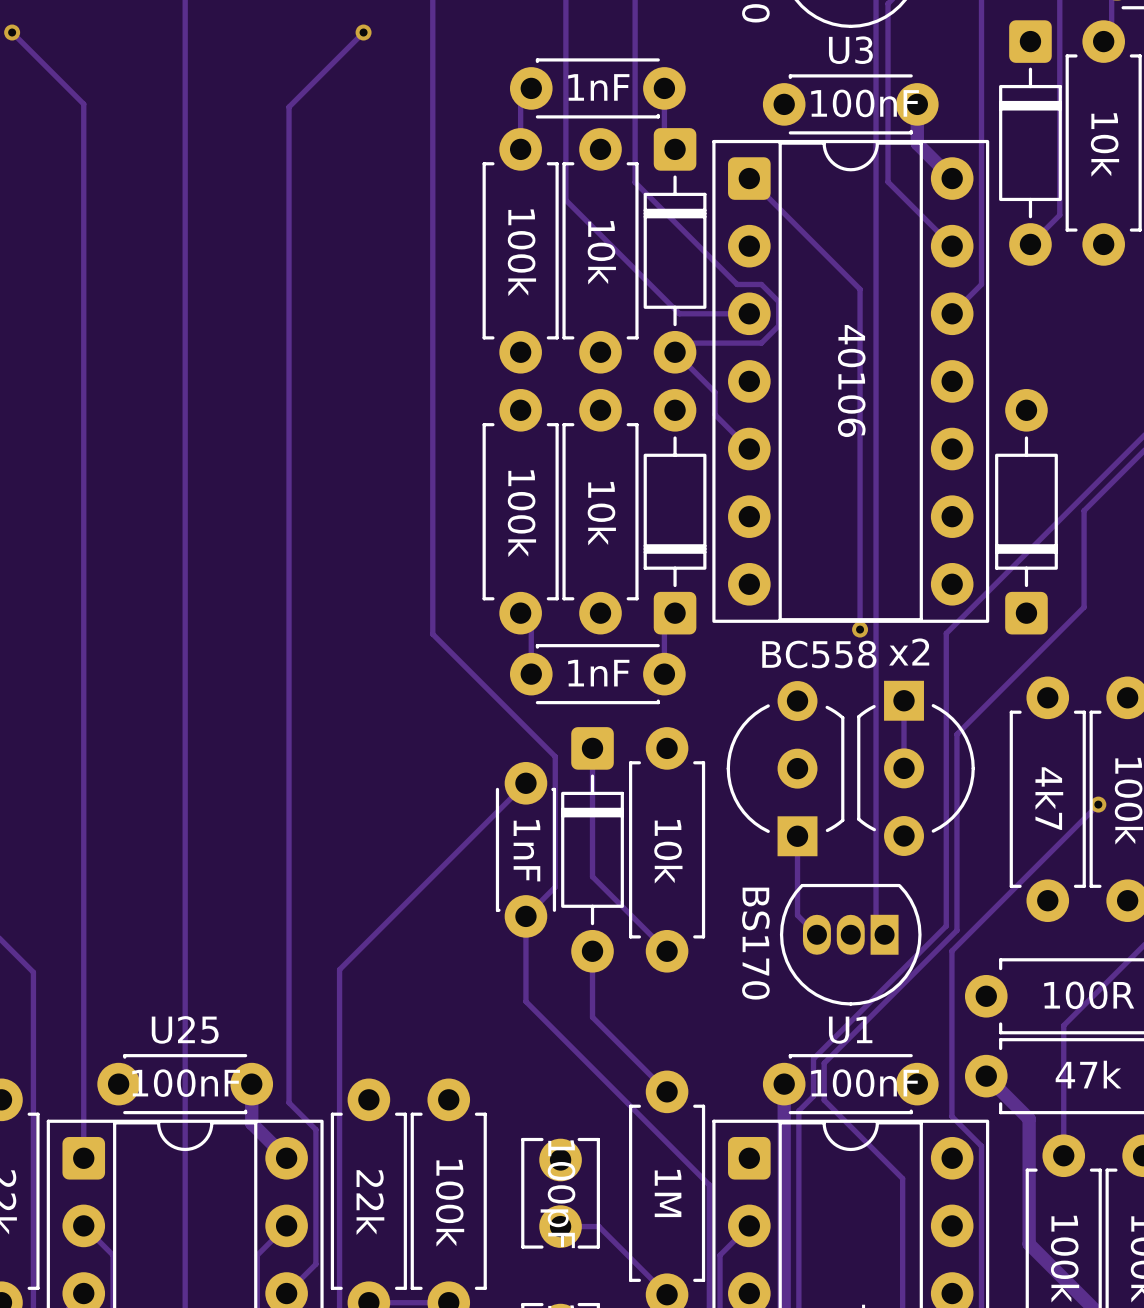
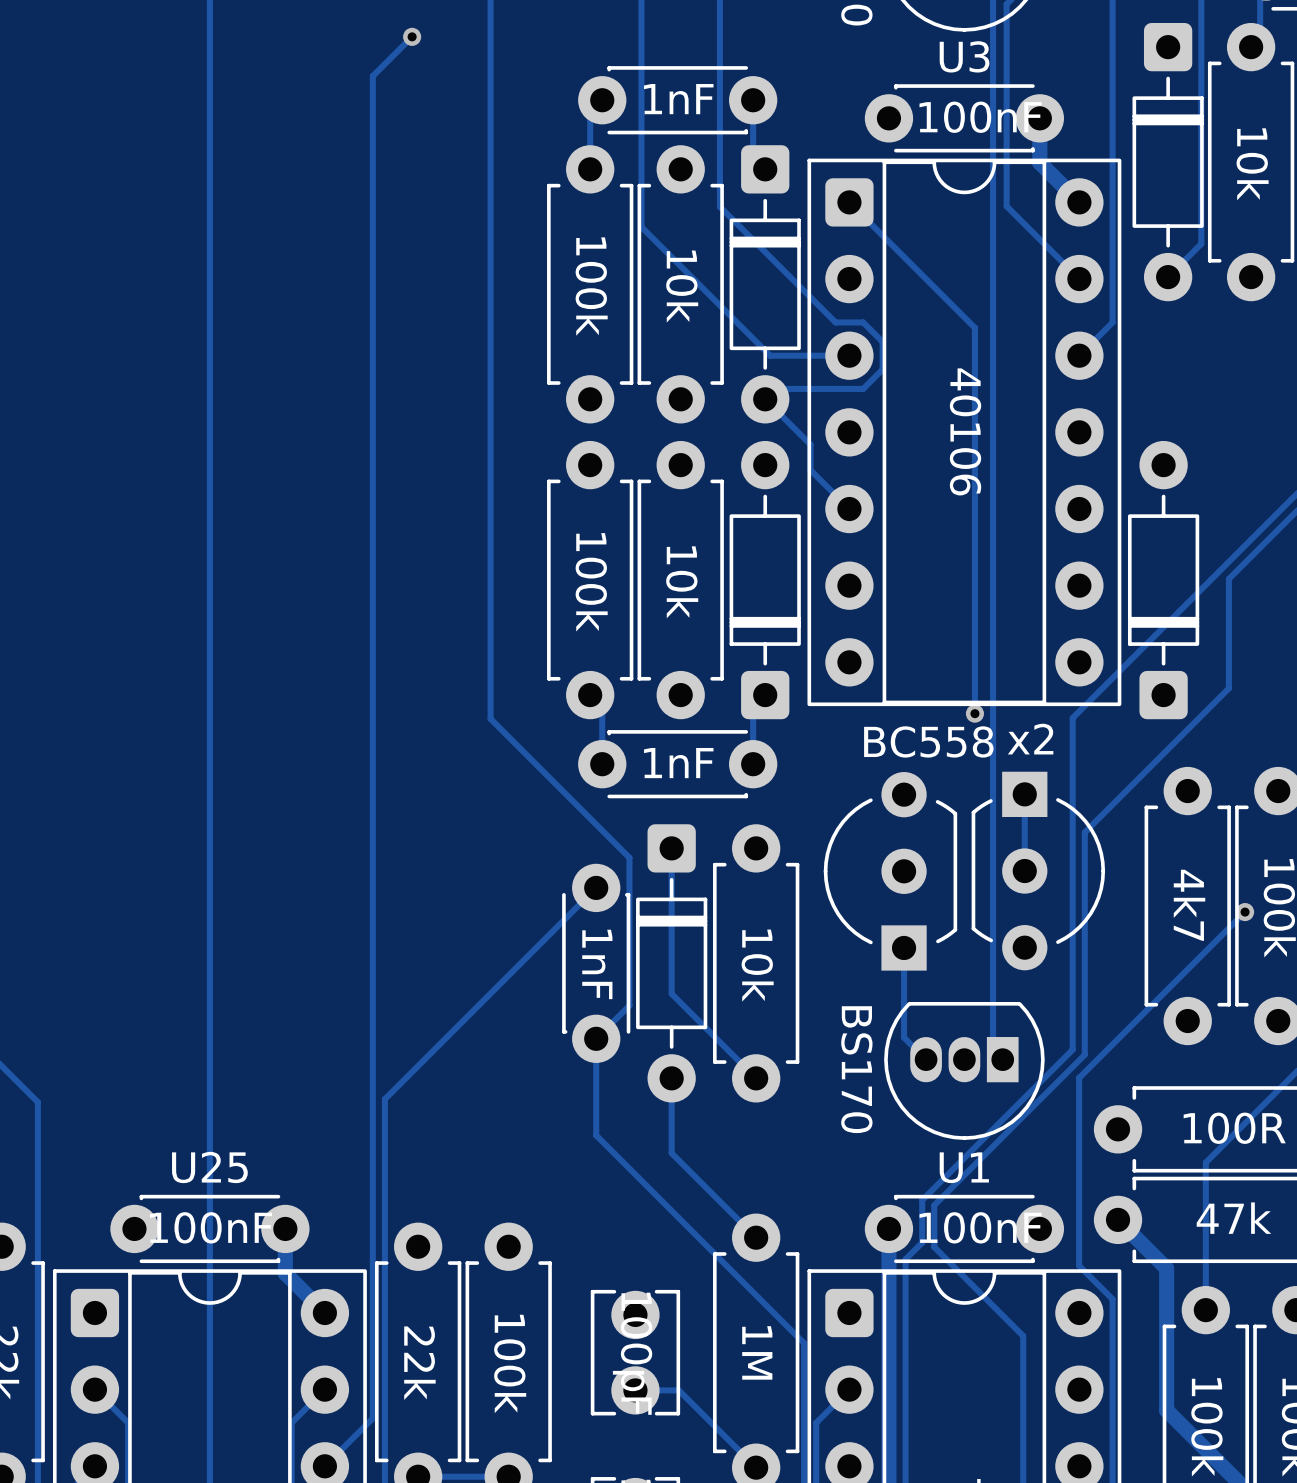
track: (12, 32) (83, 104) (83, 1158) -> none
via: (12, 32) -> none
track: (328, 67) (289, 107) (289, 1102) (315, 1129) (315, 1264) -> (372, 76) (372, 1418) (358, 1433)

